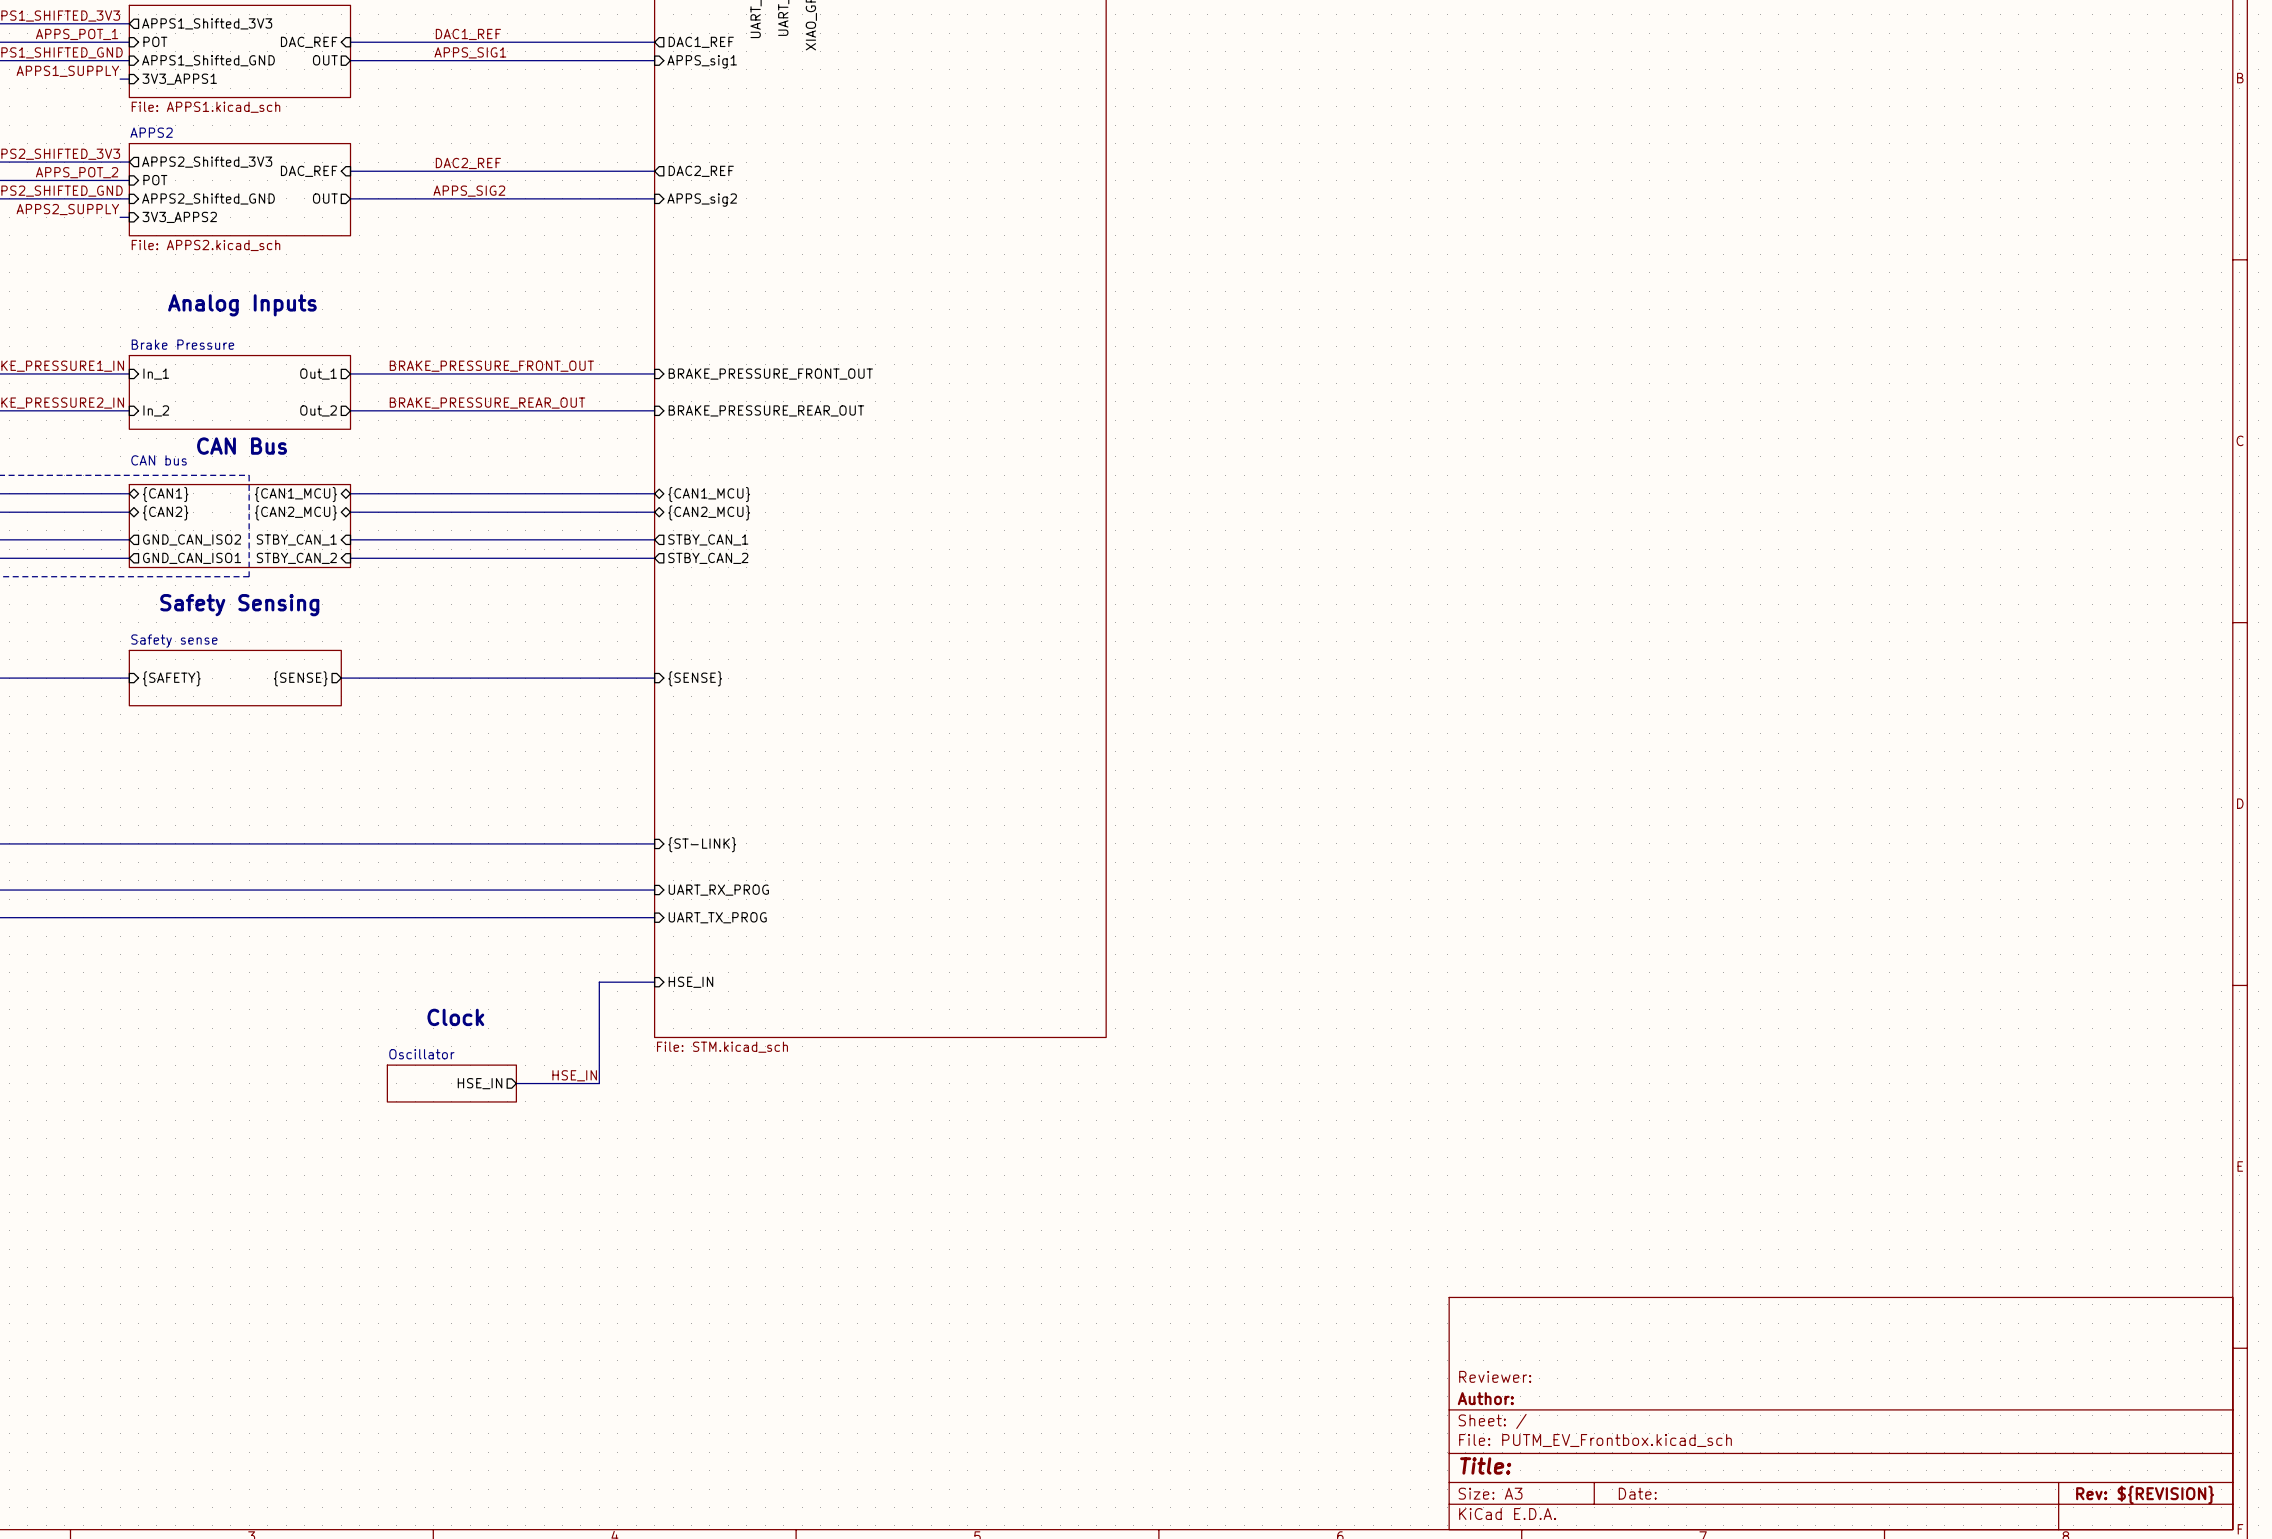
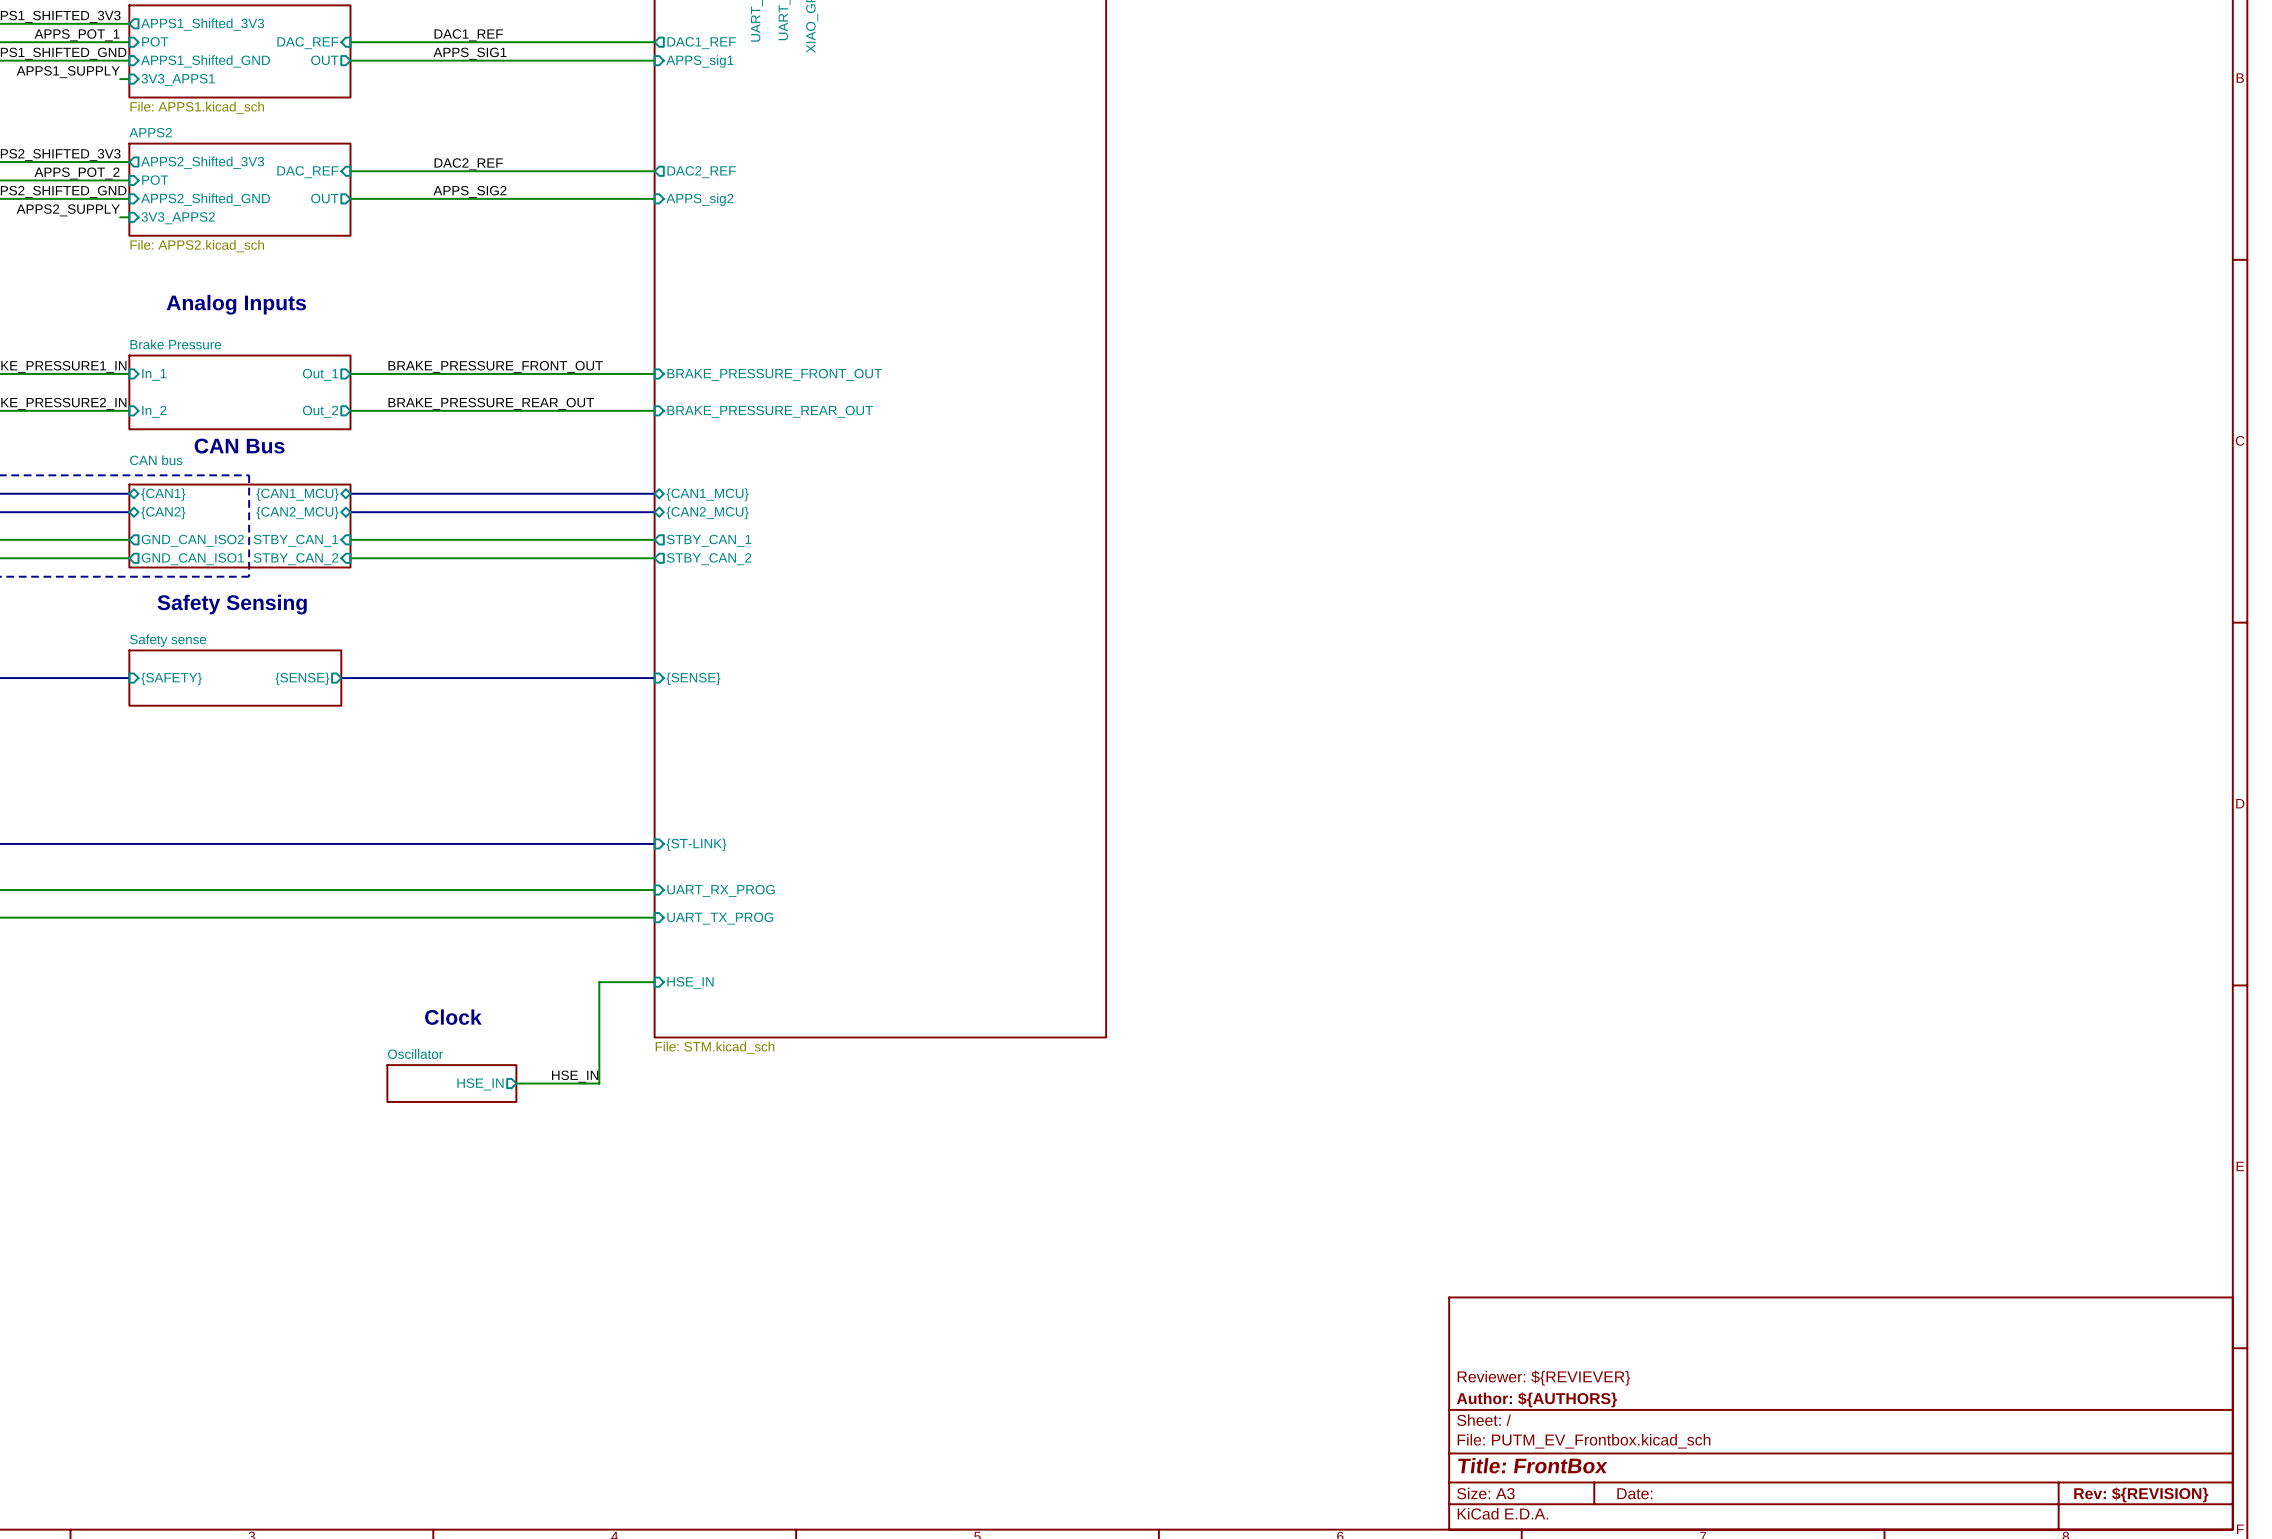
title block: Reviewer: (1495, 1376) -> Reviewer: ${REVIEVER} (1543, 1378)
title block: Author: (1485, 1398) -> Author: ${AUTHORS} (1536, 1399)
title block: Title: (1485, 1465) -> Title: FrontBox (1532, 1465)

